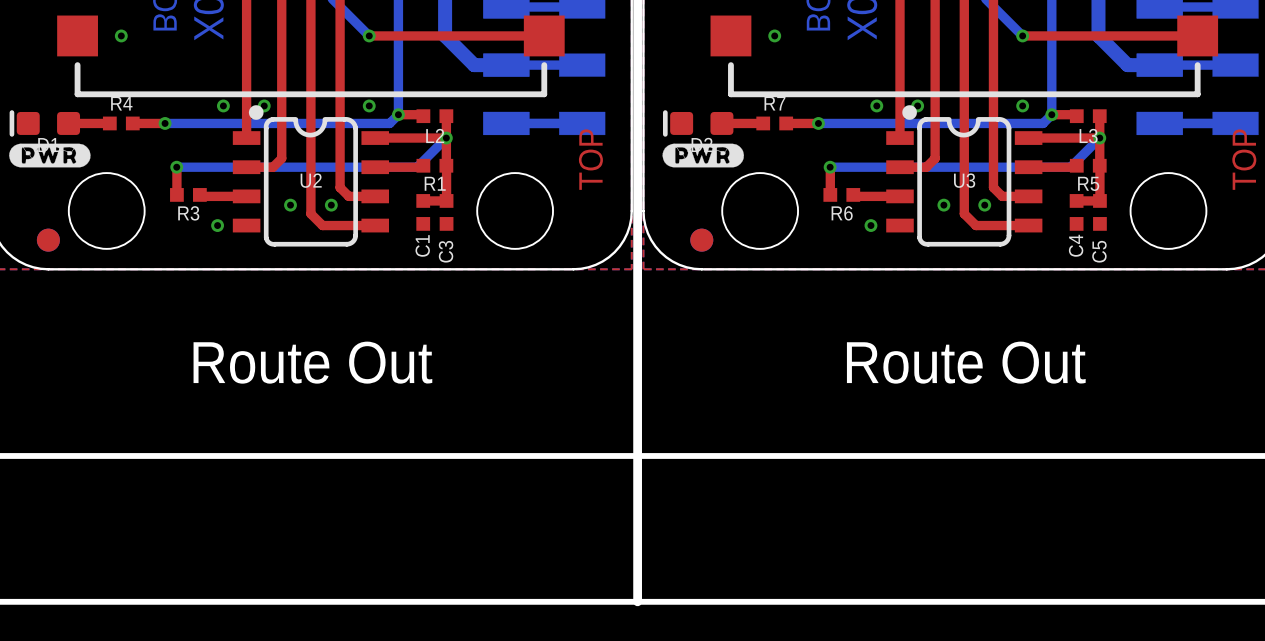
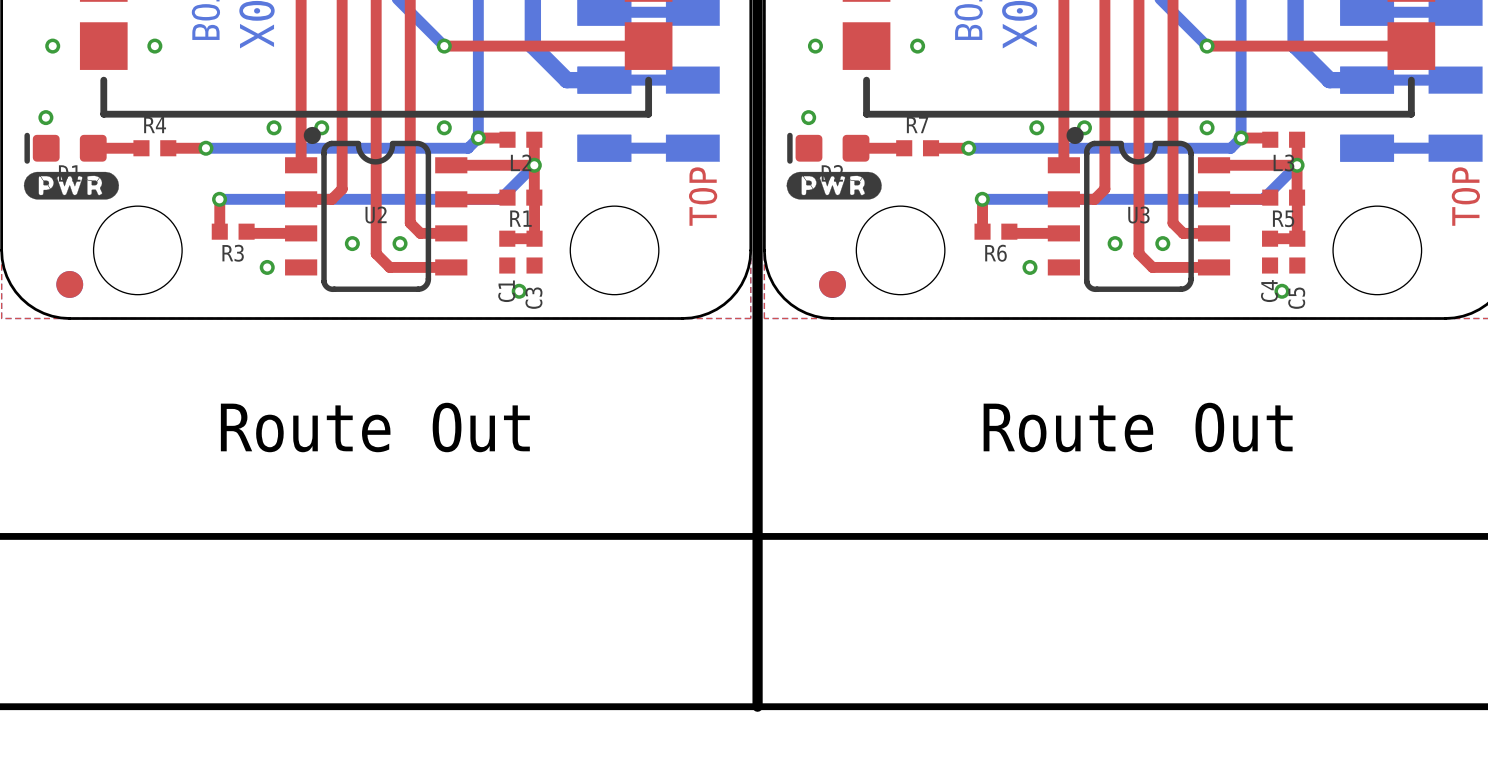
via: none -> (52, 46)
via: none -> (815, 46)
via: none -> (45, 117)
via: none -> (808, 117)
via: none -> (519, 291)
via: none -> (1281, 291)

